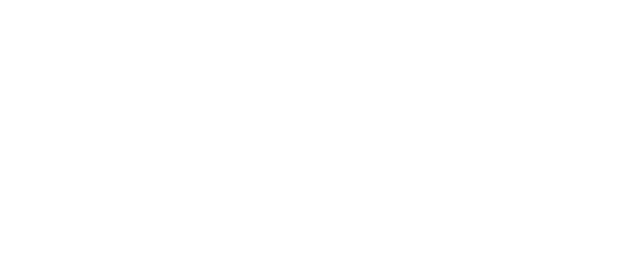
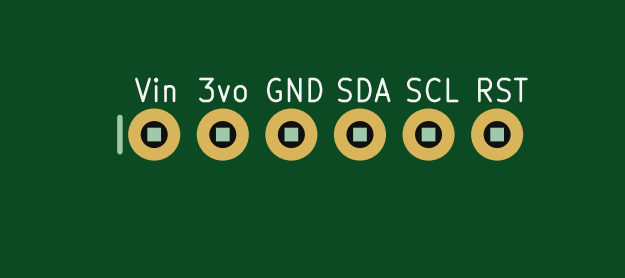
text: none -> Vin (155, 89)
text: none -> 3vo (222, 89)
text: none -> GND (294, 89)
text: none -> SDA (364, 89)
text: none -> SCL (432, 89)
text: none -> RST (502, 89)
part: none -> (320, 134)

